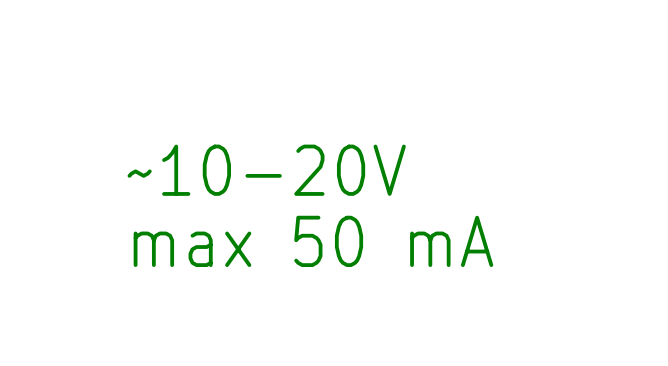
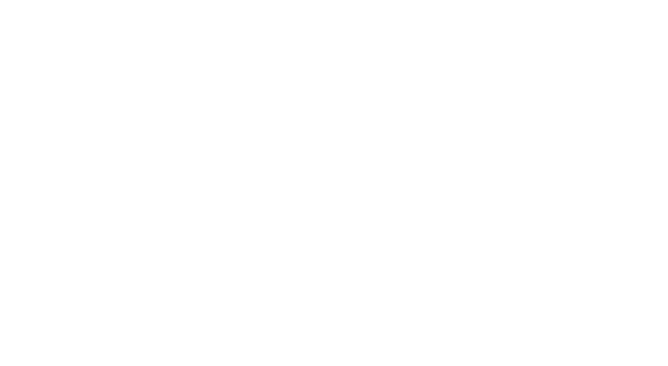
text: ~10-20V (266, 170) -> none
text: max 50 mA (313, 241) -> none

